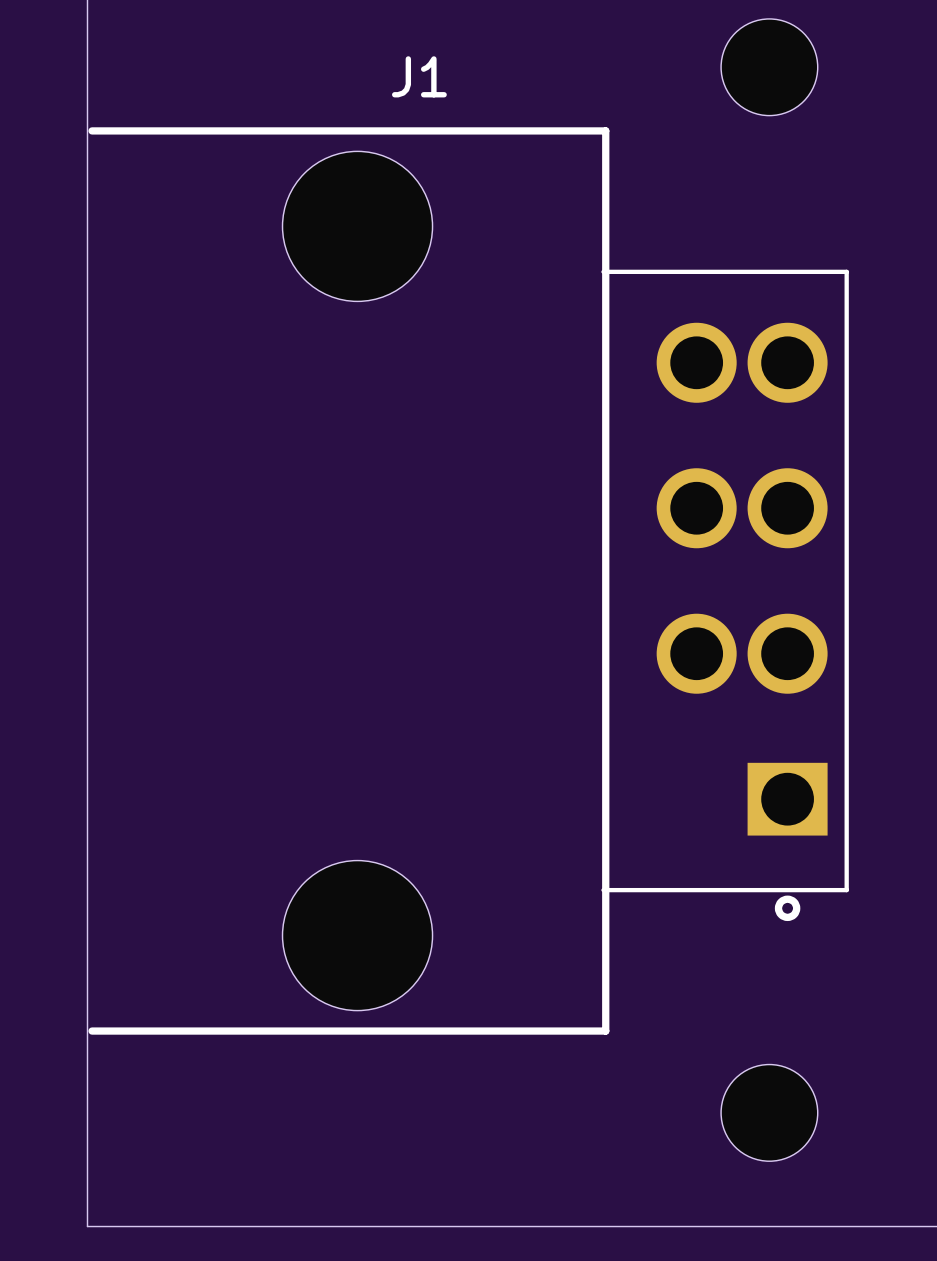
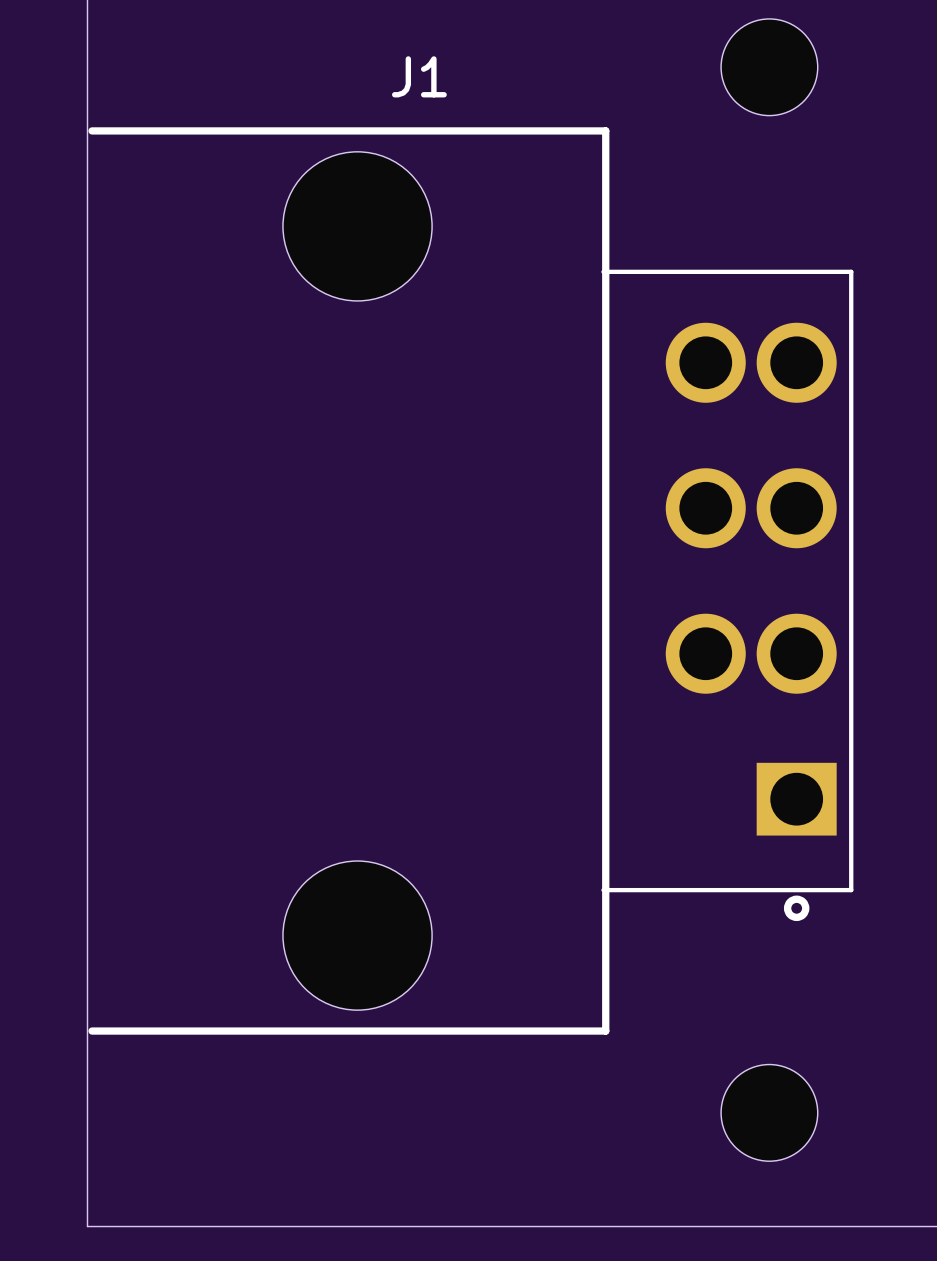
J1 footprint: [88, 127, 849, 1035] -> [88, 127, 854, 1035]

